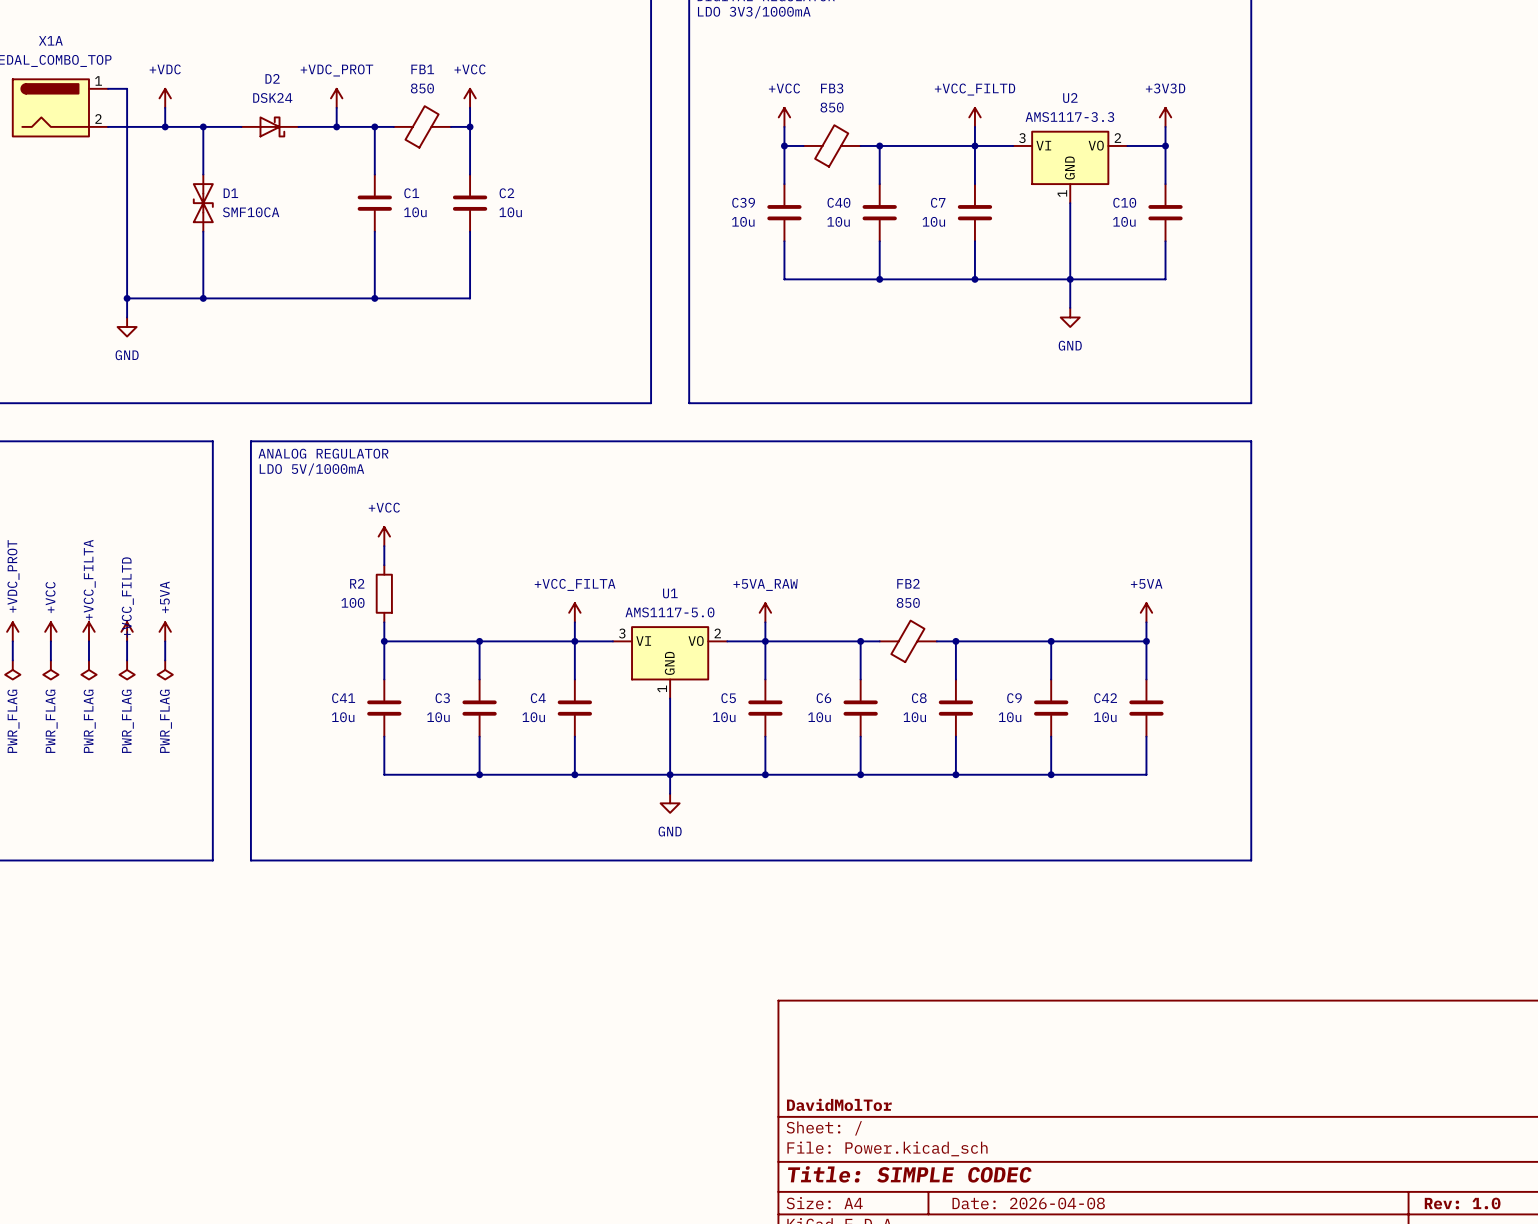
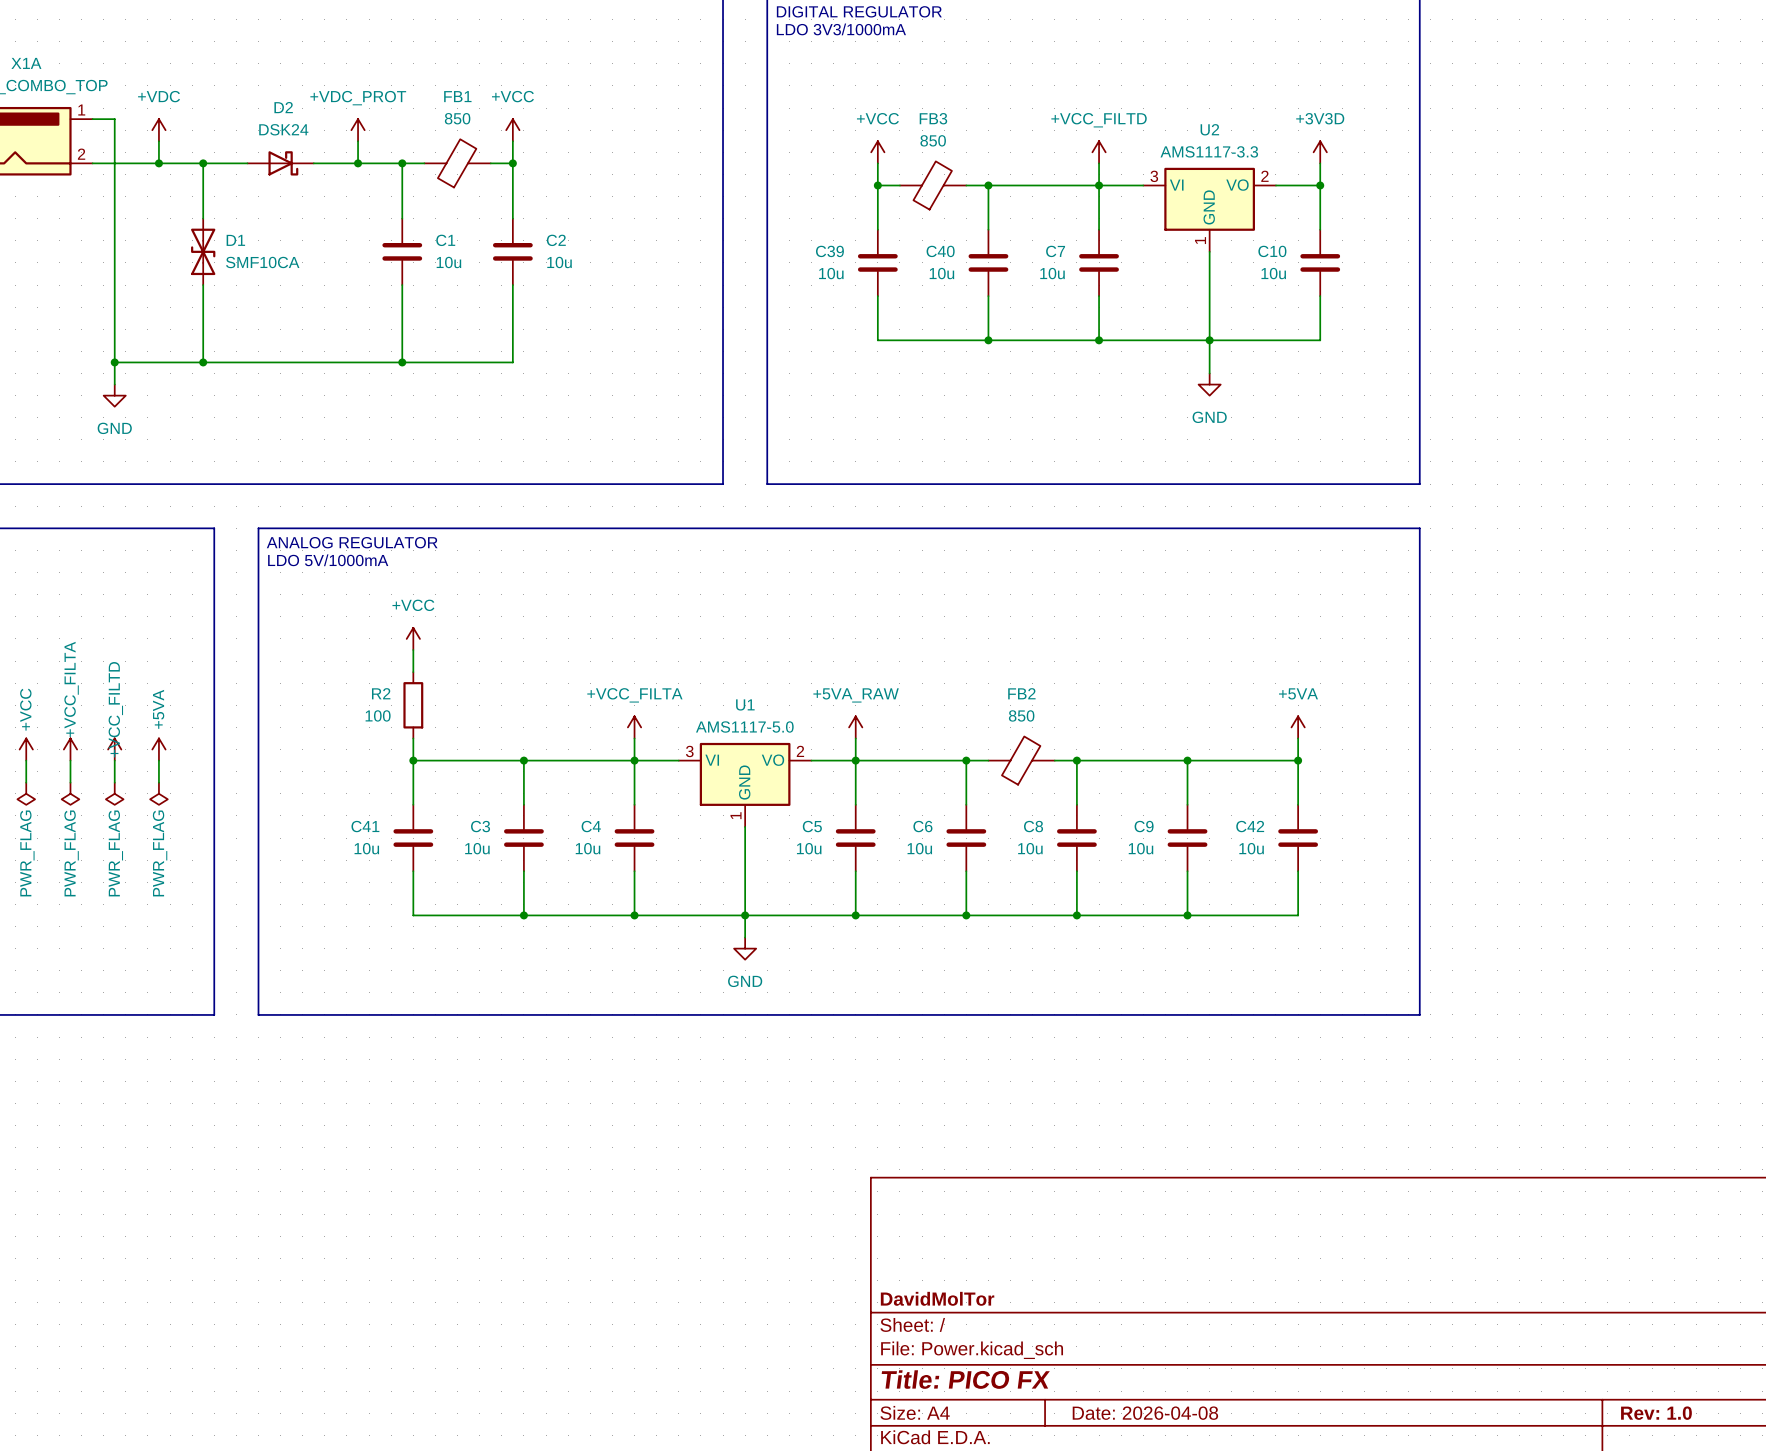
title block: Title: SIMPLE CODEC (909, 1174) -> Title: PICO FX (965, 1379)

